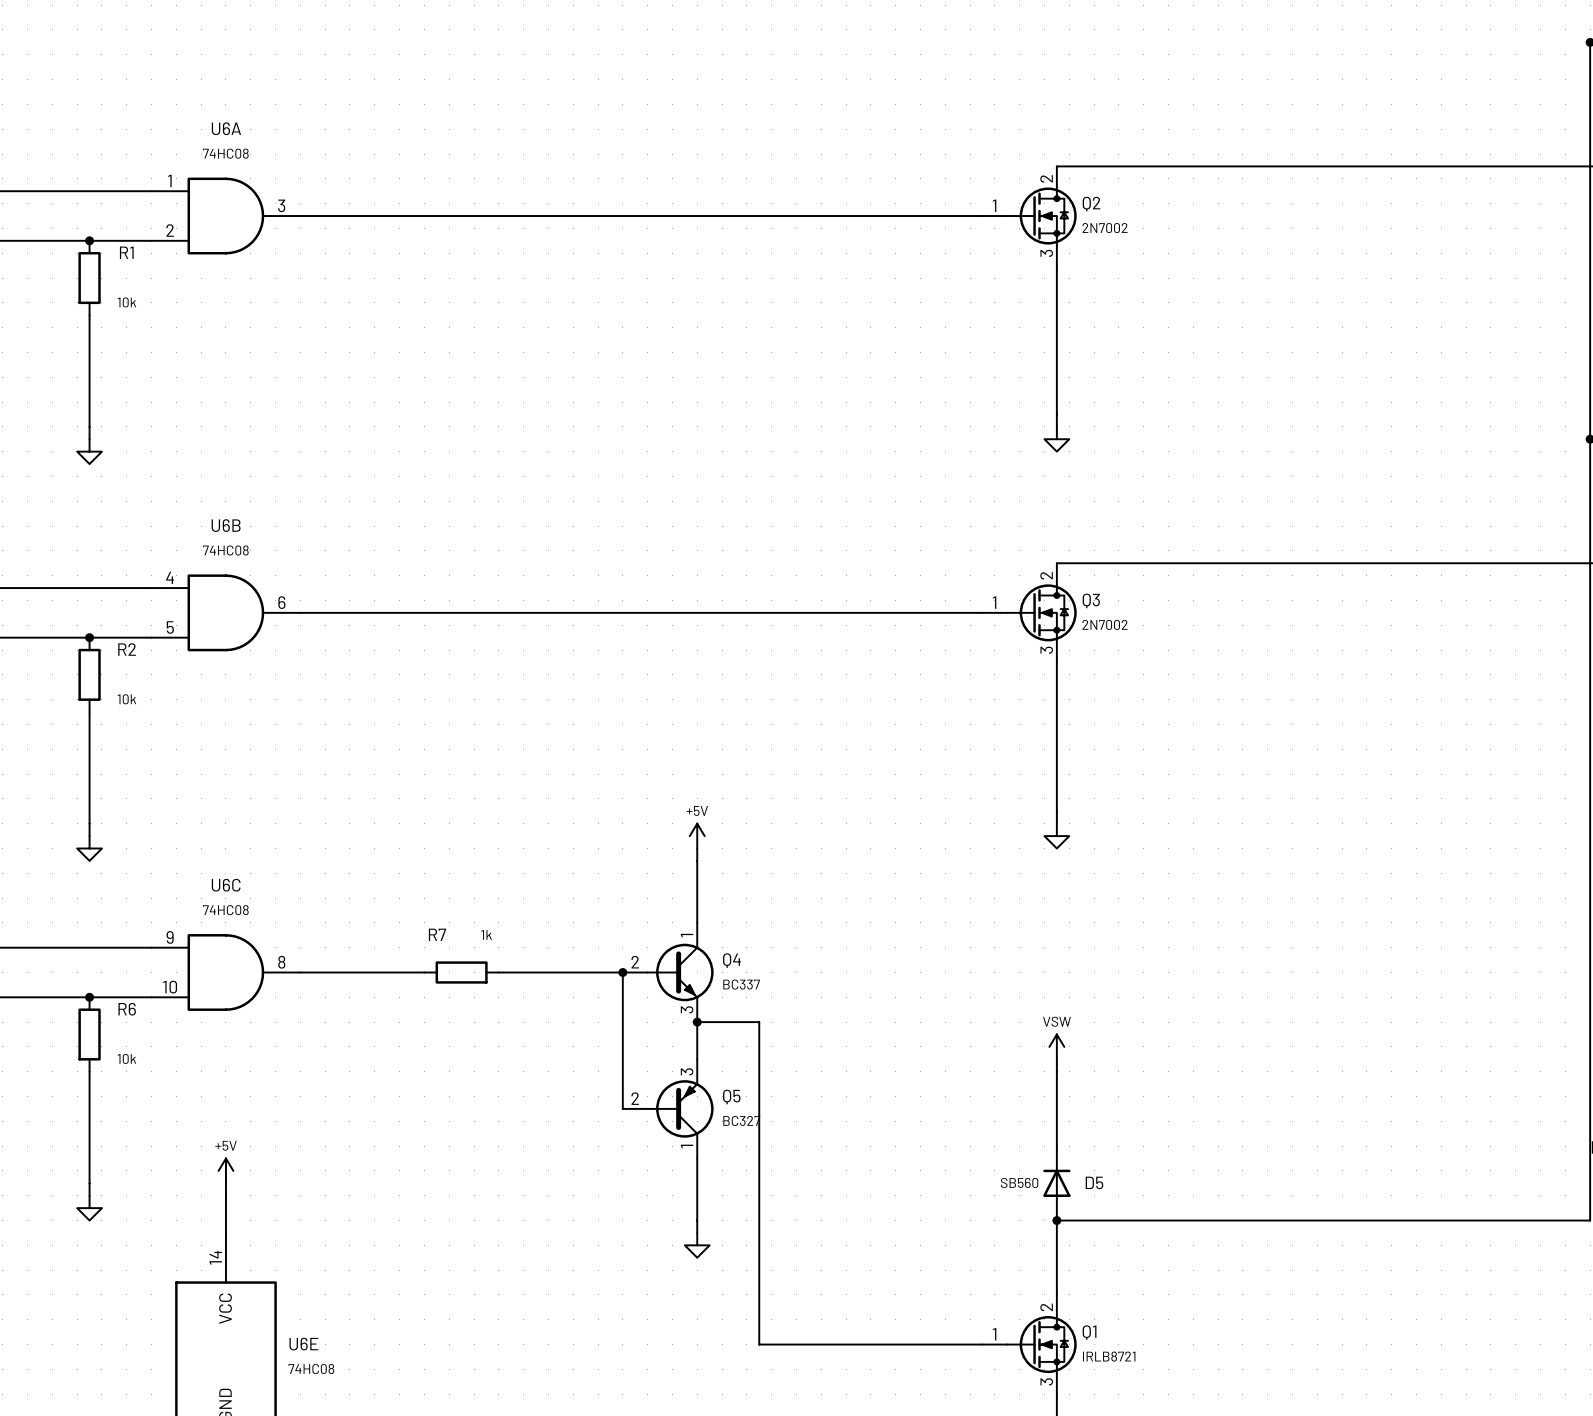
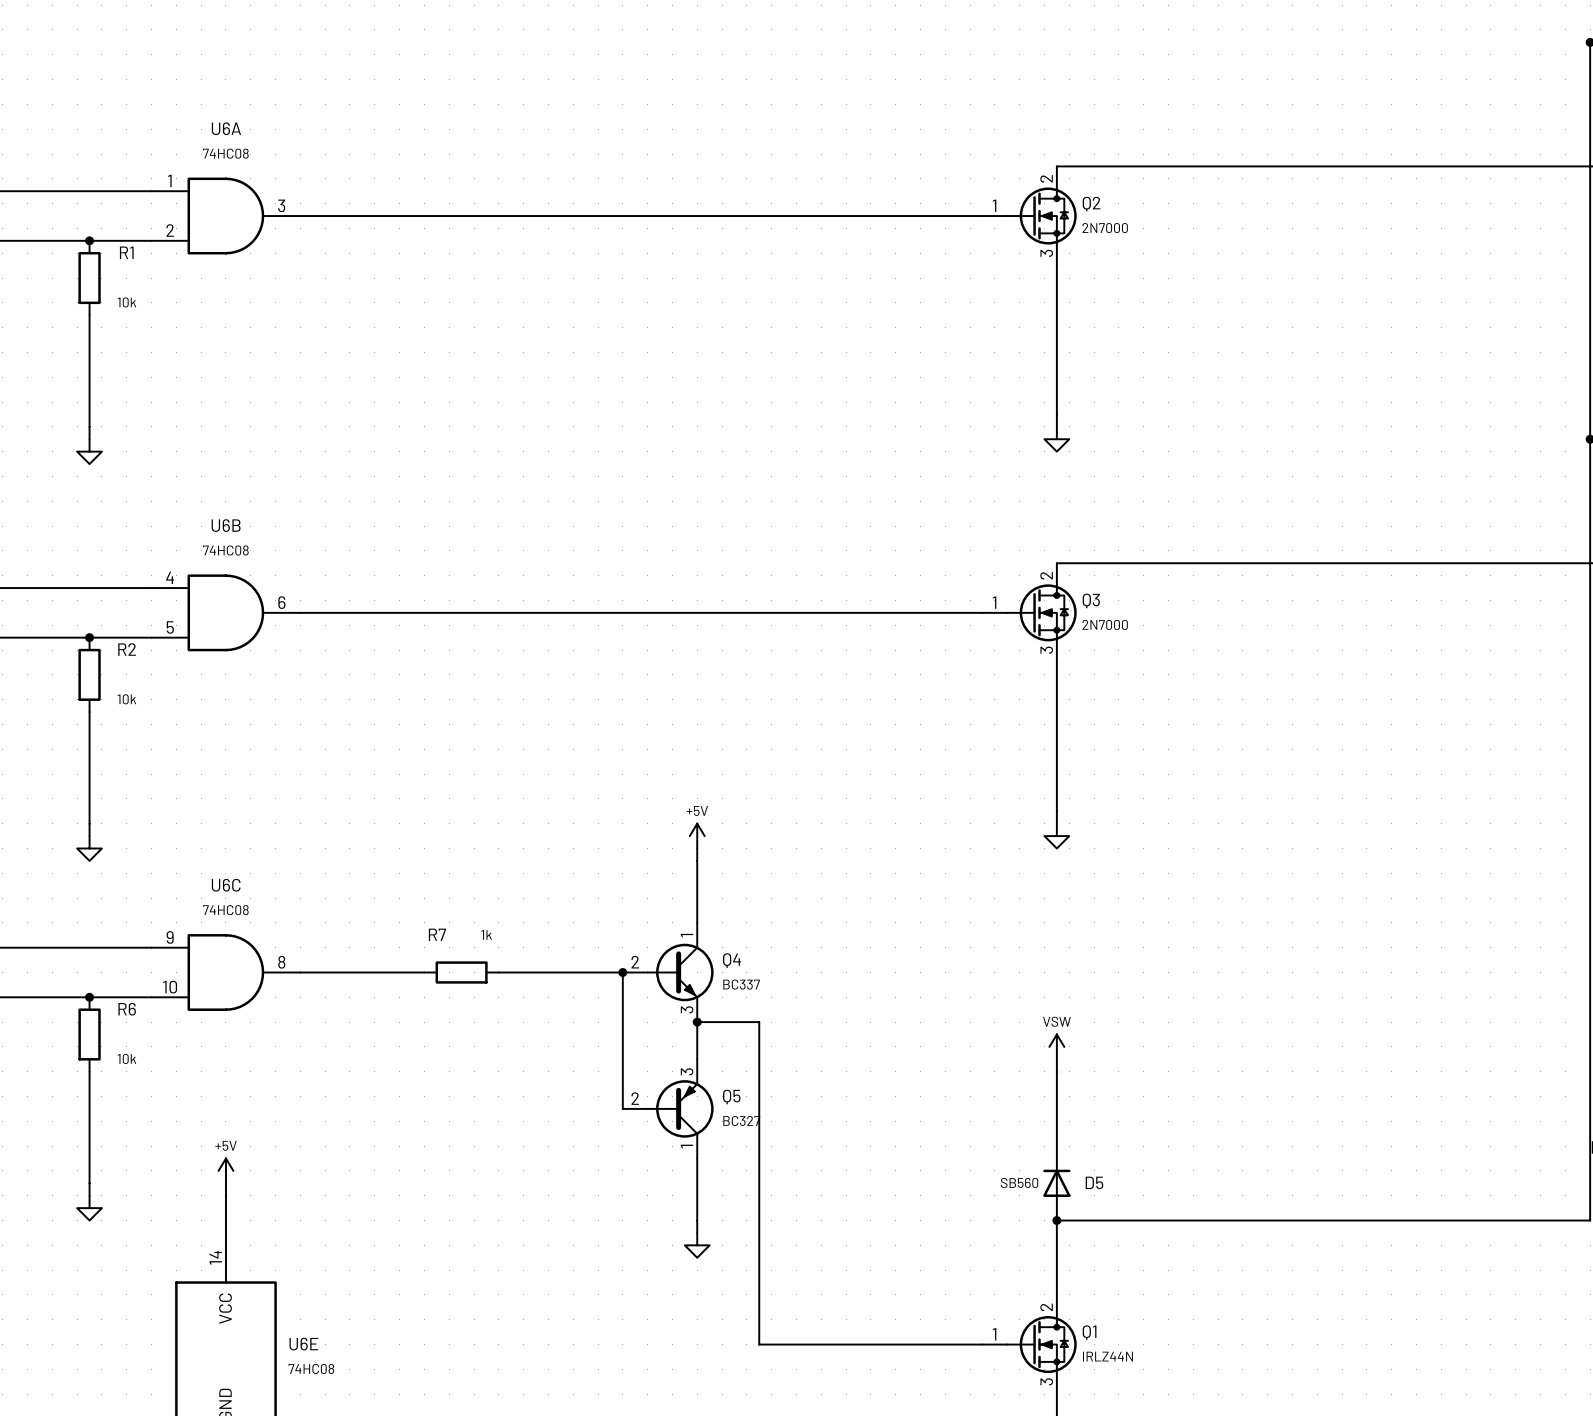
Q2 value: 2N7002 (1105, 228) -> 2N7000 (1105, 228)
Q3 value: 2N7002 (1105, 624) -> 2N7000 (1105, 624)
Q1 value: IRLB8721 (1109, 1356) -> IRLZ44N (1107, 1356)

